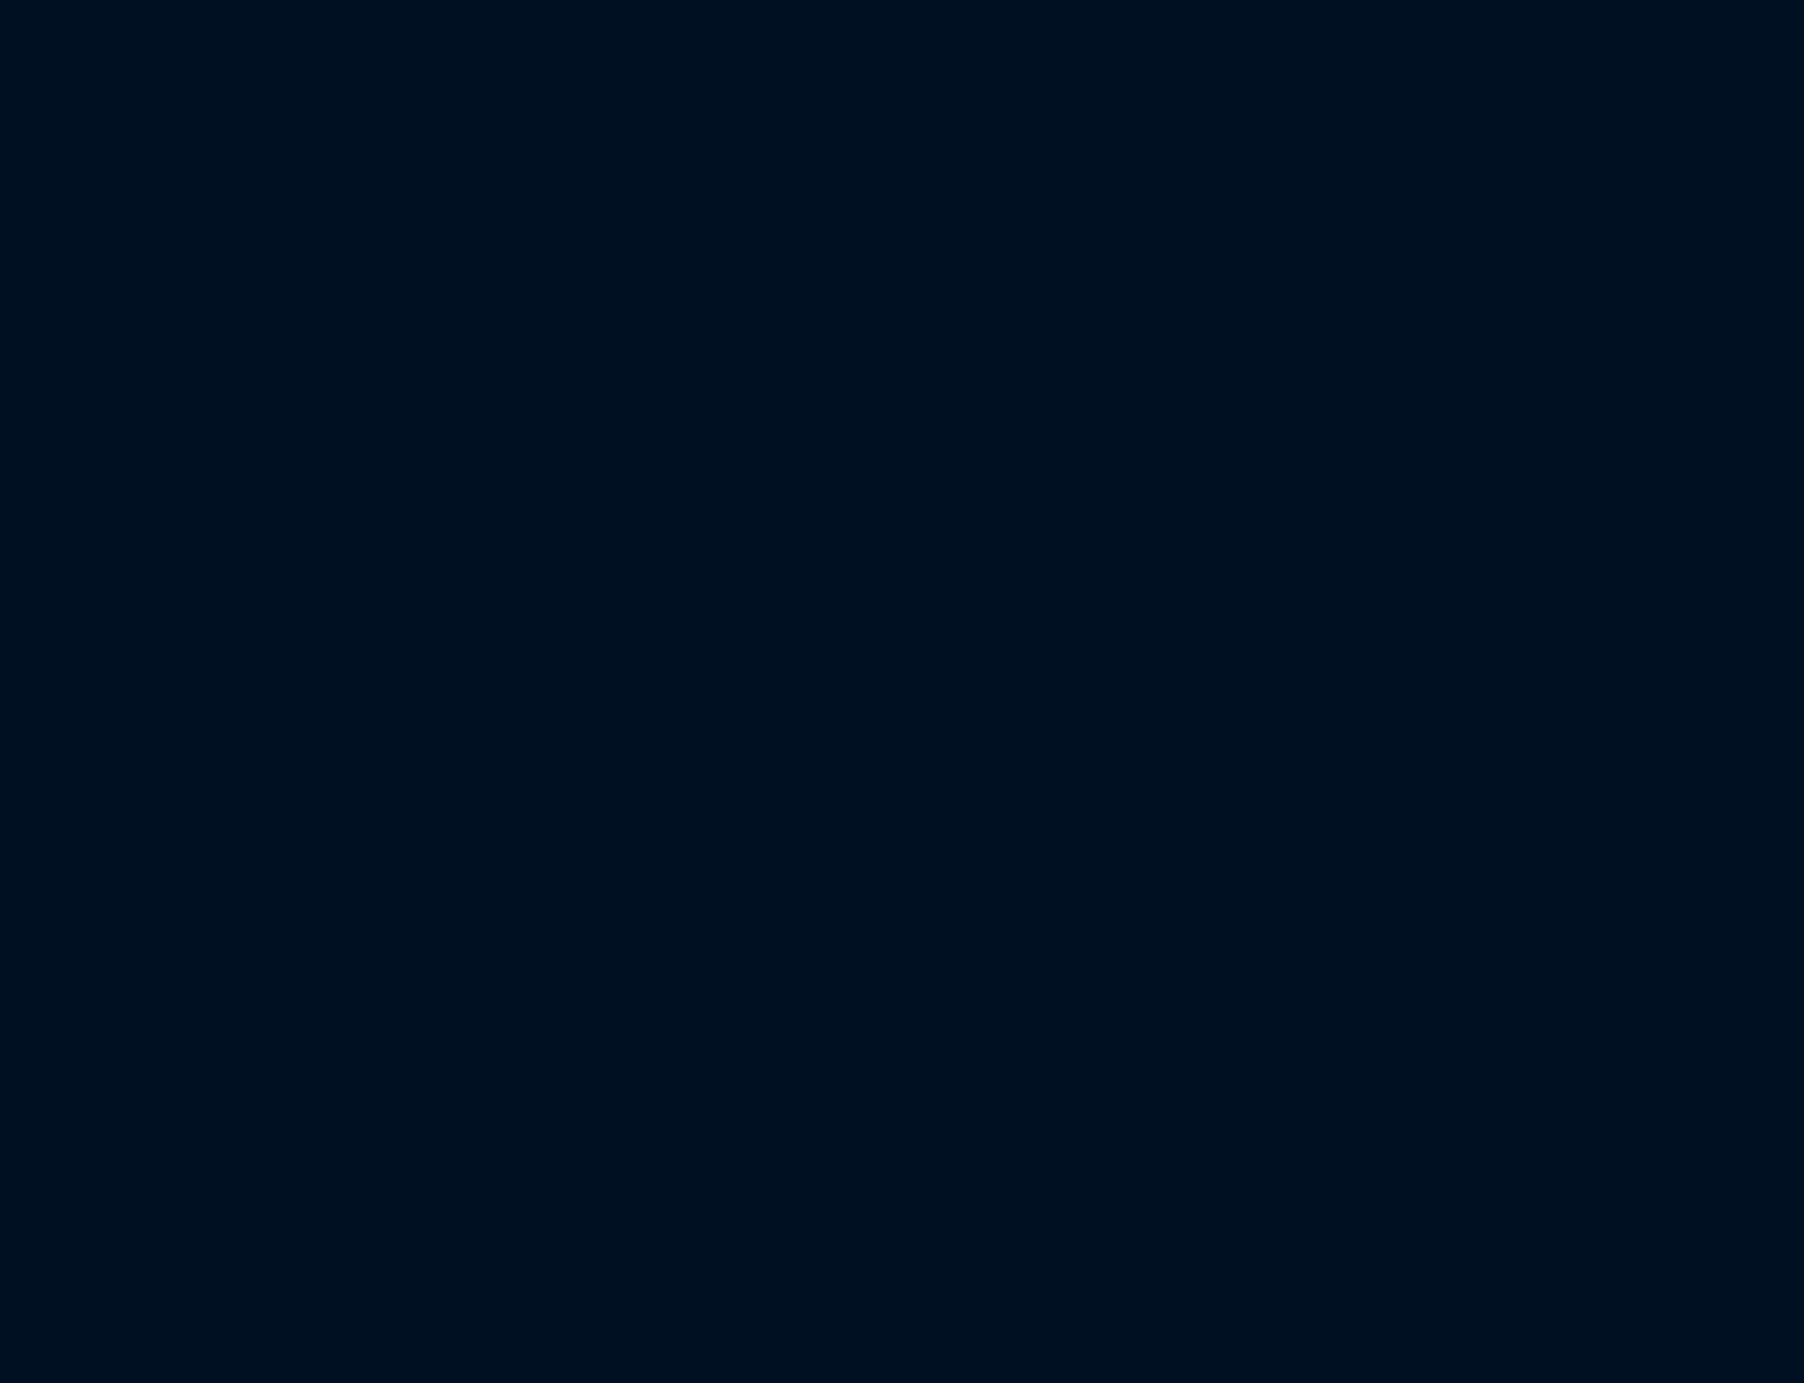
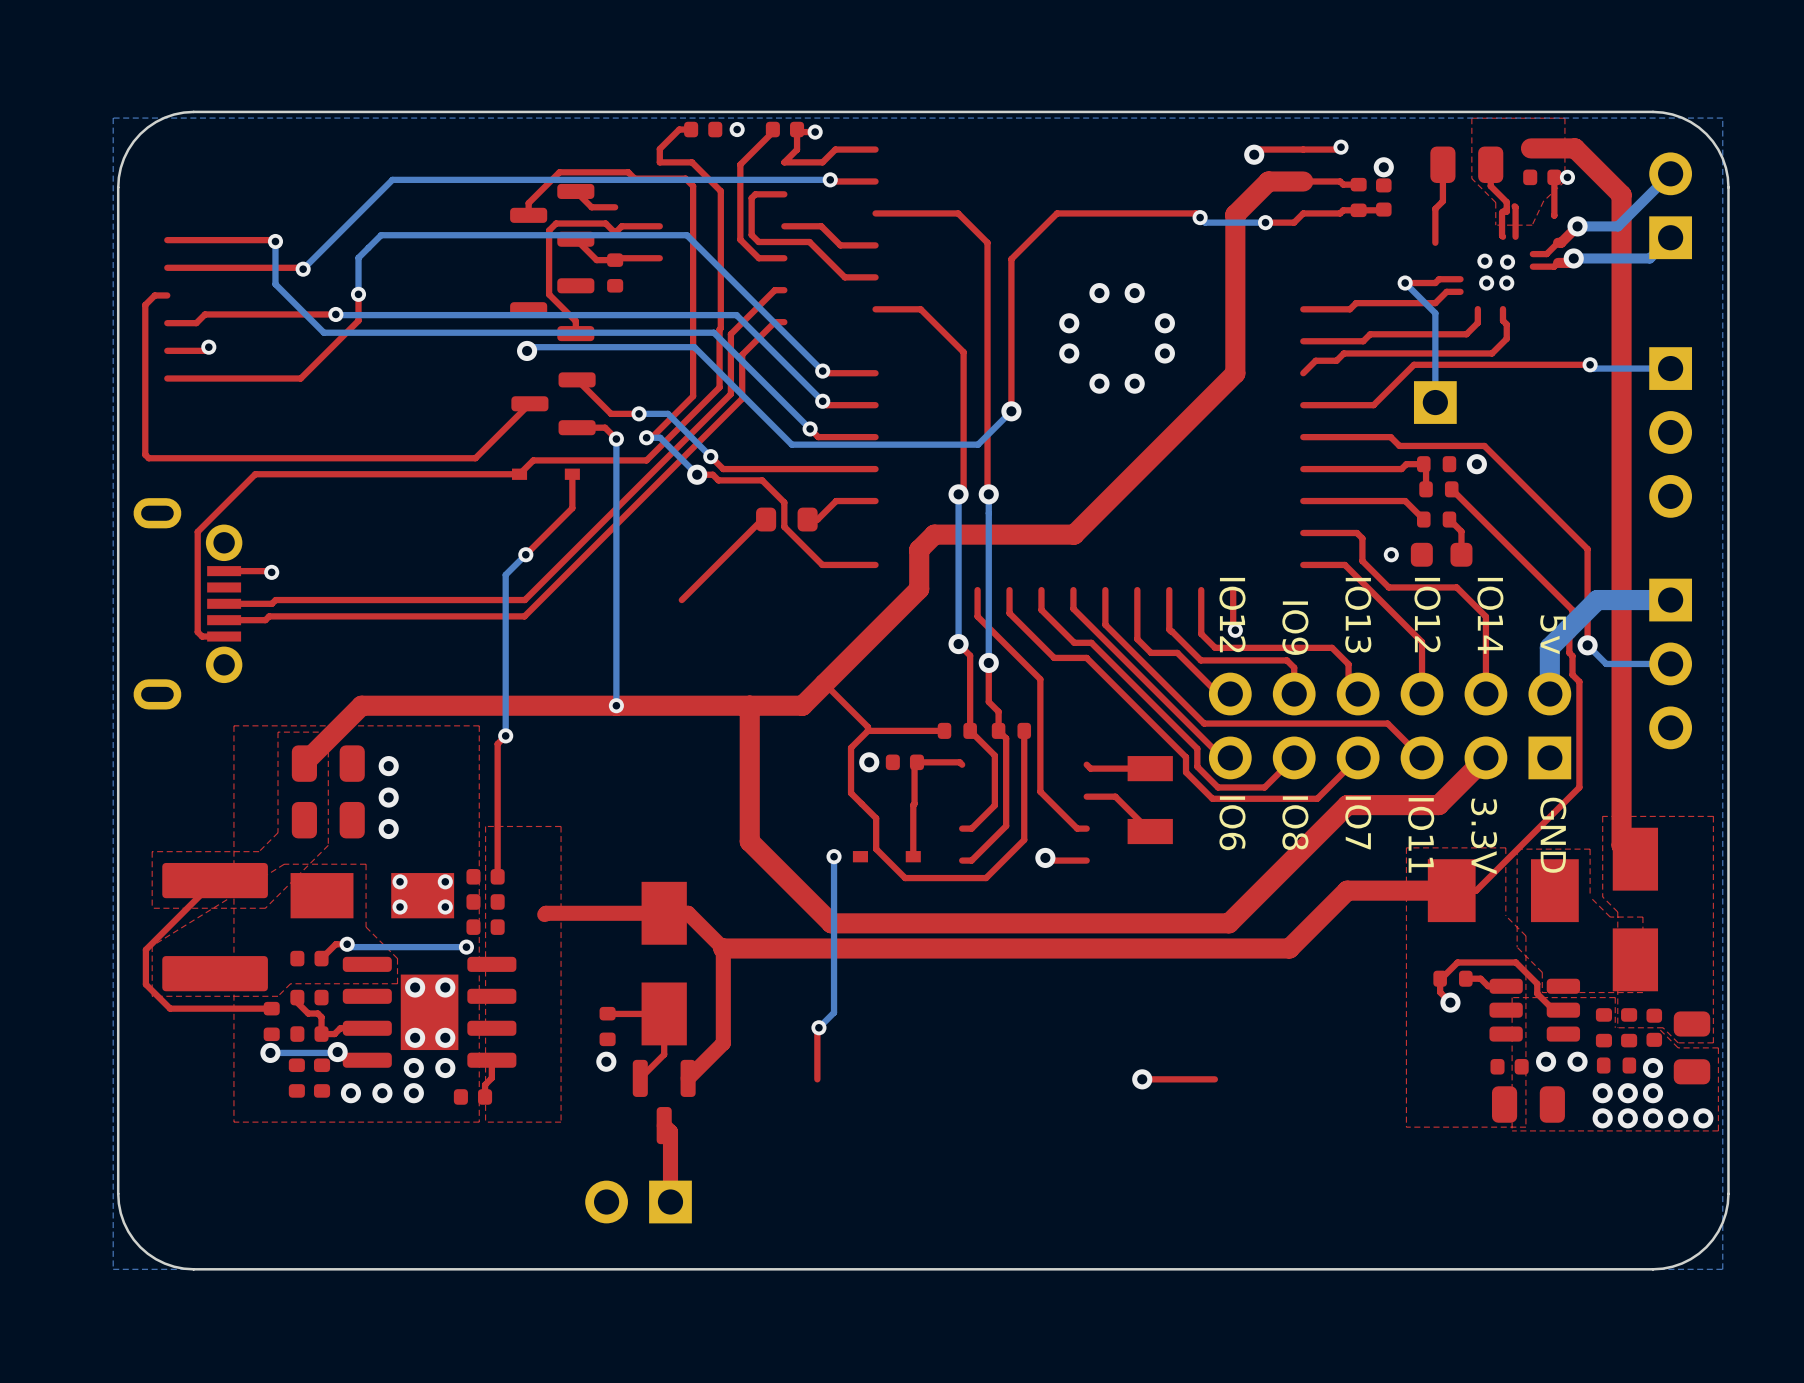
board edge: none -> (1653, 111) (193, 111) (174, 114) (147, 127) (128, 149) (120, 167) (118, 187) (118, 1193) (123, 1222) (133, 1239) (147, 1253) (164, 1263) (193, 1269) (1653, 1269) (1681, 1263) (1698, 1253) (1712, 1239) (1722, 1222) (1728, 1193) (1728, 187) (1722, 158) (1706, 134) (1681, 117) (1653, 111)
top zone outline: none -> (1564, 118) (1564, 181) (1543, 201) (1532, 225) (1495, 225) (1495, 202) (1471, 178) (1471, 118) (1564, 118)
bottom zone outline: none -> (1722, 118) (1722, 1269) (113, 1269) (113, 118) (1722, 118)
top track: none -> (691, 129) (679, 129) (659, 149) (659, 162) (692, 162) (720, 191) (719, 387) (646, 460) (533, 460) (519, 474) (255, 474) (197, 531) (197, 632) (202, 636) (224, 636)
part: none -> (703, 129)
via: none -> (737, 129)
part: none -> (784, 129)
top track: none -> (772, 132) (740, 164) (740, 239) (758, 258) (784, 258)
top track: none -> (815, 132) (797, 132) (797, 149) (784, 162) (822, 162) (835, 149) (875, 149)
via: none -> (815, 132)
top track: none -> (1341, 147) (1338, 149) (1259, 149) (1254, 154)
via: none -> (1341, 147)
top track: none -> (1530, 148) (1575, 148) (1621, 194) (1621, 845) (1635, 859)
via: none -> (1254, 154)
top track: none -> (1442, 164) (1442, 201) (1435, 208) (1435, 242)
part: none -> (1466, 164)
top track: none -> (1490, 164) (1490, 186) (1506, 202) (1506, 211) (1502, 212) (1502, 236)
via: none -> (1383, 167)
bottom track: none -> (1670, 173) (1618, 226) (1577, 226)
part: none -> (1542, 177)
top track: none -> (1567, 177) (1554, 177) (1554, 215)
via: none -> (1567, 177)
top track: none -> (830, 179) (831, 181) (875, 181)
bottom track: none -> (830, 179) (392, 179) (303, 269)
via: none -> (830, 179)
top track: none -> (1358, 184) (1343, 184) (1340, 181) (1268, 181) (1235, 214) (1235, 373) (1074, 534) (934, 534) (919, 549) (919, 589) (802, 705) (361, 705) (304, 763)
top track: none -> (575, 191) (591, 207) (615, 207)
top track: none -> (784, 194) (755, 194) (751, 198) (751, 235) (758, 242) (809, 242) (844, 277) (875, 277)
part: none -> (1358, 197)
part: none -> (1383, 197)
part: none -> (1670, 205)
top track: none -> (1514, 206) (1515, 236)
top track: none -> (1383, 209) (1343, 210) (1340, 213) (1303, 213) (1294, 222) (1265, 222)
top track: none -> (875, 213) (958, 213) (987, 242) (988, 494)
top track: none -> (528, 215) (528, 203) (559, 172) (628, 172) (634, 178) (685, 178) (693, 186) (693, 396) (651, 437) (646, 437)
part: none -> (552, 215)
top track: none -> (1200, 217) (1195, 213) (1057, 213) (1011, 259) (1011, 411)
bottom track: none -> (1200, 217) (1205, 222) (1265, 222)
via: none -> (1200, 217)
via: none -> (1265, 222)
top track: none -> (659, 226) (621, 226) (615, 232) (605, 223) (556, 223) (549, 230) (549, 294) (575, 321) (575, 333)
top track: none -> (784, 226) (821, 226) (840, 245) (875, 245)
top track: none -> (1577, 226) (1546, 254) (1532, 254)
via: none -> (1577, 226)
bottom track: none -> (1670, 237) (1649, 258) (1573, 258)
top track: none -> (575, 239) (596, 260) (659, 258)
top track: none -> (167, 240) (275, 241)
bottom track: none -> (275, 241) (275, 284) (323, 332) (713, 332) (810, 428)
via: none -> (275, 241)
top track: none -> (1573, 258) (1569, 262) (1558, 262) (1554, 266) (1532, 266)
via: none -> (1573, 258)
via: none -> (1484, 261)
via: none -> (1507, 262)
top track: none -> (167, 267) (303, 269)
via: none -> (303, 269)
part: none -> (615, 272)
top track: none -> (1460, 279) (1439, 279) (1435, 283) (1405, 283)
bottom track: none -> (1405, 283) (1435, 313) (1435, 402)
via: none -> (1405, 283)
via: none -> (1486, 283)
via: none -> (1506, 283)
top track: none -> (784, 290) (774, 290) (730, 334) (730, 394) (524, 600) (275, 600) (271, 603) (224, 603)
top track: none -> (1460, 291) (1446, 291) (1435, 303) (1356, 303) (1349, 309) (1303, 309)
via: none -> (1099, 293)
via: none -> (1134, 293)
top track: none -> (358, 294) (358, 320) (300, 378) (167, 378)
bottom track: none -> (358, 294) (358, 257) (381, 235) (686, 235) (822, 371)
via: none -> (358, 294)
top track: none -> (167, 295) (154, 295) (145, 305) (145, 454) (148, 458) (475, 458) (529, 403)
part: none -> (552, 309)
top track: none -> (875, 309) (920, 309) (963, 352) (963, 489) (958, 494)
top track: none -> (1477, 309) (1477, 322) (1466, 334) (1370, 334) (1363, 341) (1303, 341)
top track: none -> (1502, 309) (1502, 320) (1506, 324) (1506, 338) (1492, 353) (1343, 353) (1336, 360) (1315, 360) (1303, 373)
top track: none -> (335, 314) (205, 314) (196, 323) (167, 323)
bottom track: none -> (335, 314) (736, 315) (822, 401)
via: none -> (335, 314)
top track: none -> (784, 322) (774, 322) (742, 354) (742, 398) (524, 616) (269, 616) (265, 620) (224, 620)
via: none -> (1069, 323)
via: none -> (1164, 323)
top track: none -> (208, 347) (205, 350) (167, 350)
via: none -> (208, 347)
bottom track: none -> (527, 350) (530, 347) (694, 347) (791, 444) (978, 444) (1011, 411)
via: none -> (527, 350)
via: none -> (1069, 353)
via: none -> (1164, 353)
top track: none -> (1590, 364) (1414, 364) (1373, 405) (1303, 405)
bottom track: none -> (1590, 364) (1593, 368) (1670, 368)
via: none -> (1590, 364)
top track: none -> (822, 371) (824, 373) (875, 373)
via: none -> (822, 371)
top track: none -> (577, 379) (611, 413) (639, 413)
via: none -> (1099, 383)
via: none -> (1134, 383)
top track: none -> (822, 401) (826, 405) (875, 405)
via: none -> (822, 401)
part: none -> (1435, 402)
part: none -> (553, 403)
via: none -> (1011, 411)
bottom track: none -> (639, 413) (667, 413) (710, 456)
via: none -> (639, 413)
top track: none -> (577, 427) (605, 427) (616, 439)
top track: none -> (810, 428) (818, 437) (875, 437)
via: none -> (810, 428)
part: none -> (1670, 432)
bottom track: none -> (646, 437) (660, 437) (697, 474)
via: none -> (646, 437)
top track: none -> (1303, 437) (1390, 437) (1399, 445) (1484, 445) (1587, 549) (1587, 645)
bottom track: none -> (616, 439) (616, 705)
via: none -> (616, 439)
top track: none -> (710, 456) (723, 469) (875, 469)
via: none -> (710, 456)
part: none -> (1436, 464)
via: none -> (1476, 464)
top track: none -> (1303, 469) (1401, 469) (1406, 464) (1423, 464) (1426, 466) (1426, 489)
part: none -> (545, 474)
top track: none -> (572, 474) (572, 508) (525, 554)
top track: none -> (697, 474) (712, 474) (718, 480) (762, 480) (784, 502) (784, 526) (822, 564) (875, 564)
via: none -> (697, 474)
part: none -> (1438, 489)
top track: none -> (1451, 489) (1572, 610) (1572, 634) (1569, 637) (1569, 652) (1572, 656) (1572, 674) (1579, 681) (1579, 787) (1476, 890) (1347, 890) (1289, 948) (723, 948)
bottom track: none -> (958, 494) (958, 644)
via: none -> (958, 494)
bottom track: none -> (988, 494) (988, 662)
via: none -> (988, 494)
top track: none -> (875, 501) (836, 501) (817, 519) (807, 519)
top track: none -> (1303, 501) (1405, 501) (1423, 519)
top track: none -> (766, 519) (762, 519) (681, 600)
part: none -> (786, 519)
part: none -> (1436, 519)
top track: none -> (1449, 519) (1461, 531) (1461, 554)
top track: none -> (1303, 532) (1356, 532) (1362, 538) (1362, 561) (1388, 587) (1456, 587) (1485, 616) (1485, 694)
bottom track: none -> (525, 554) (505, 574) (505, 735)
via: none -> (525, 554)
via: none -> (1391, 554)
part: none -> (1441, 554)
top track: none -> (1303, 564) (1344, 564) (1422, 642) (1422, 694)
top track: none -> (224, 571) (271, 572)
via: none -> (271, 572)
top track: none -> (977, 590) (977, 616) (1040, 679) (1040, 791) (1077, 828) (1086, 828)
top track: none -> (1009, 590) (1009, 613) (1054, 657) (1086, 657) (1186, 757) (1186, 772) (1212, 798) (1317, 798) (1358, 757)
top track: none -> (1041, 590) (1041, 609) (1074, 642) (1091, 642) (1197, 748) (1197, 766) (1218, 787) (1264, 787) (1294, 757)
top track: none -> (1073, 590) (1073, 608) (1222, 757) (1230, 757)
top track: none -> (1105, 590) (1105, 624) (1204, 723) (1387, 723) (1422, 757)
top track: none -> (1137, 590) (1137, 639) (1151, 652) (1177, 652) (1218, 694)
top track: none -> (1169, 590) (1169, 629) (1200, 660) (1286, 660) (1294, 667) (1294, 694)
top track: none -> (1201, 590) (1201, 633) (1215, 647) (1332, 647) (1348, 664) (1348, 684) (1358, 694)
top track: none -> (1233, 590) (1233, 628) (1235, 630)
bottom track: none -> (1670, 600) (1597, 600) (1549, 647) (1549, 694)
part: none -> (187, 603)
text: none -> IO12 (1232, 615)
text: none -> IO13 (1358, 615)
text: none -> IO12 (1427, 615)
text: none -> IO14 (1490, 615)
text: none -> IO9 (1295, 628)
via: none -> (1235, 630)
text: none -> 5v (1553, 634)
top track: none -> (958, 644) (970, 655) (970, 730) (994, 755) (994, 805) (971, 828) (962, 828)
via: none -> (958, 644)
bottom track: none -> (1587, 645) (1606, 663) (1670, 663)
via: none -> (1587, 645)
top track: none -> (988, 662) (988, 701) (998, 711) (998, 730) (1006, 738) (1006, 826) (971, 860) (962, 860)
via: none -> (988, 662)
part: none -> (1670, 663)
top track: none -> (824, 683) (868, 727) (868, 730)
via: none -> (616, 705)
top track: none -> (749, 705) (749, 841) (831, 923) (1229, 923) (1347, 805) (1438, 805) (1485, 757)
top zone outline: none -> (479, 725) (479, 1122) (233, 1122) (233, 725) (479, 725)
part: none -> (1390, 725)
top track: none -> (944, 730) (868, 730)
part: none -> (957, 730)
part: none -> (1011, 730)
top track: none -> (1024, 730) (1024, 839) (986, 878) (905, 878) (876, 849) (876, 818) (851, 793) (851, 747) (868, 730)
top zone outline: none -> (328, 732) (328, 845) (265, 908) (152, 908) (152, 851) (259, 851) (277, 832) (277, 732) (328, 732)
top track: none -> (505, 735) (497, 743) (497, 876)
via: none -> (505, 735)
via: none -> (869, 762)
part: none -> (904, 762)
part: none -> (328, 763)
top track: none -> (962, 764) (959, 762) (917, 762) (914, 764) (913, 856)
top track: none -> (1086, 764) (1090, 768) (1150, 768)
via: none -> (388, 766)
top track: none -> (1086, 796) (1115, 796) (1150, 831)
via: none -> (388, 797)
part: none -> (1150, 800)
part: none -> (328, 820)
text: none -> IO6 (1232, 823)
text: none -> IO8 (1295, 823)
text: none -> IO7 (1358, 822)
top zone outline: none -> (561, 826) (561, 1122) (485, 1122) (485, 826) (561, 826)
via: none -> (388, 829)
text: none -> IO11 (1421, 835)
text: none -> GND (1553, 835)
text: none -> 3.3V (1484, 836)
top zone outline: none -> (1505, 847) (1505, 915) (1525, 935) (1525, 1127) (1406, 1127) (1406, 847) (1505, 847)
top zone outline: none -> (1590, 849) (1590, 896) (1610, 917) (1642, 917) (1642, 992) (1542, 992) (1542, 972) (1517, 947) (1517, 849) (1590, 849)
bottom track: none -> (834, 856) (834, 1012) (818, 1027)
via: none -> (834, 856)
part: none -> (886, 856)
top track: none -> (1045, 857) (1048, 860) (1086, 860)
via: none -> (1045, 857)
top zone outline: none -> (366, 864) (366, 927) (397, 958) (397, 983) (290, 983) (277, 996) (152, 996) (152, 946) (284, 864) (366, 864)
part: none -> (485, 876)
top track: none -> (215, 880) (145, 949) (145, 984) (170, 1008) (271, 1008)
via: none -> (400, 881)
via: none -> (445, 881)
part: none -> (1503, 890)
part: none -> (372, 895)
part: none -> (485, 901)
via: none -> (400, 907)
via: none -> (445, 907)
part: none -> (1635, 909)
top track: none -> (544, 914) (688, 913) (723, 948)
part: none -> (215, 927)
part: none -> (485, 927)
top track: none -> (347, 944) (335, 944) (321, 958)
bottom track: none -> (347, 944) (350, 947) (466, 947)
via: none -> (347, 944)
via: none -> (466, 947)
top track: none -> (723, 948) (723, 1043) (688, 1078)
part: none -> (309, 958)
part: none -> (664, 963)
part: none -> (1452, 978)
top track: none -> (1465, 978) (1480, 978) (1488, 986) (1506, 986)
via: none -> (415, 987)
via: none -> (445, 987)
part: none -> (309, 997)
top track: none -> (297, 1002) (308, 1013) (317, 1013) (321, 1017) (321, 1034) (334, 1034) (340, 1028) (367, 1028)
top track: none -> (1450, 1002) (1440, 992) (1440, 978) (1457, 962) (1515, 962) (1537, 983) (1537, 993) (1553, 1010) (1563, 1010)
via: none -> (1450, 1002)
part: none -> (1534, 1010)
part: none -> (429, 1012)
top track: none -> (607, 1013) (664, 1013) (664, 1054) (640, 1078)
part: none -> (271, 1021)
part: none -> (607, 1026)
top track: none -> (818, 1027) (817, 1029) (817, 1079)
via: none -> (818, 1027)
part: none -> (1603, 1027)
part: none -> (1629, 1027)
part: none -> (1654, 1027)
top zone outline: none -> (1658, 1027) (1678, 1047) (1718, 1047) (1718, 1130) (1512, 1130) (1512, 997) (1615, 997) (1615, 1027) (1663, 1027) (1678, 1042) (1713, 1042) (1713, 816) (1602, 816) (1602, 896) (1617, 912) (1617, 1027)
part: none -> (309, 1034)
via: none -> (415, 1037)
via: none -> (445, 1037)
part: none -> (1692, 1047)
via: none -> (270, 1052)
bottom track: none -> (337, 1052) (270, 1052)
via: none -> (337, 1052)
top track: none -> (491, 1060) (491, 1078) (485, 1084) (485, 1096)
via: none -> (606, 1061)
via: none -> (1546, 1061)
via: none -> (1577, 1061)
part: none -> (1616, 1065)
part: none -> (1509, 1066)
via: none -> (413, 1068)
via: none -> (445, 1068)
via: none -> (1653, 1068)
part: none -> (296, 1078)
part: none -> (322, 1078)
via: none -> (1142, 1079)
top track: none -> (1214, 1079) (1142, 1079)
via: none -> (350, 1093)
via: none -> (382, 1093)
via: none -> (413, 1093)
via: none -> (1602, 1093)
via: none -> (1627, 1093)
via: none -> (1653, 1093)
part: none -> (472, 1096)
part: none -> (664, 1101)
part: none -> (1528, 1104)
via: none -> (1602, 1118)
via: none -> (1627, 1118)
via: none -> (1653, 1118)
via: none -> (1678, 1118)
via: none -> (1703, 1118)
top track: none -> (664, 1125) (670, 1131) (670, 1202)
part: none -> (638, 1202)

